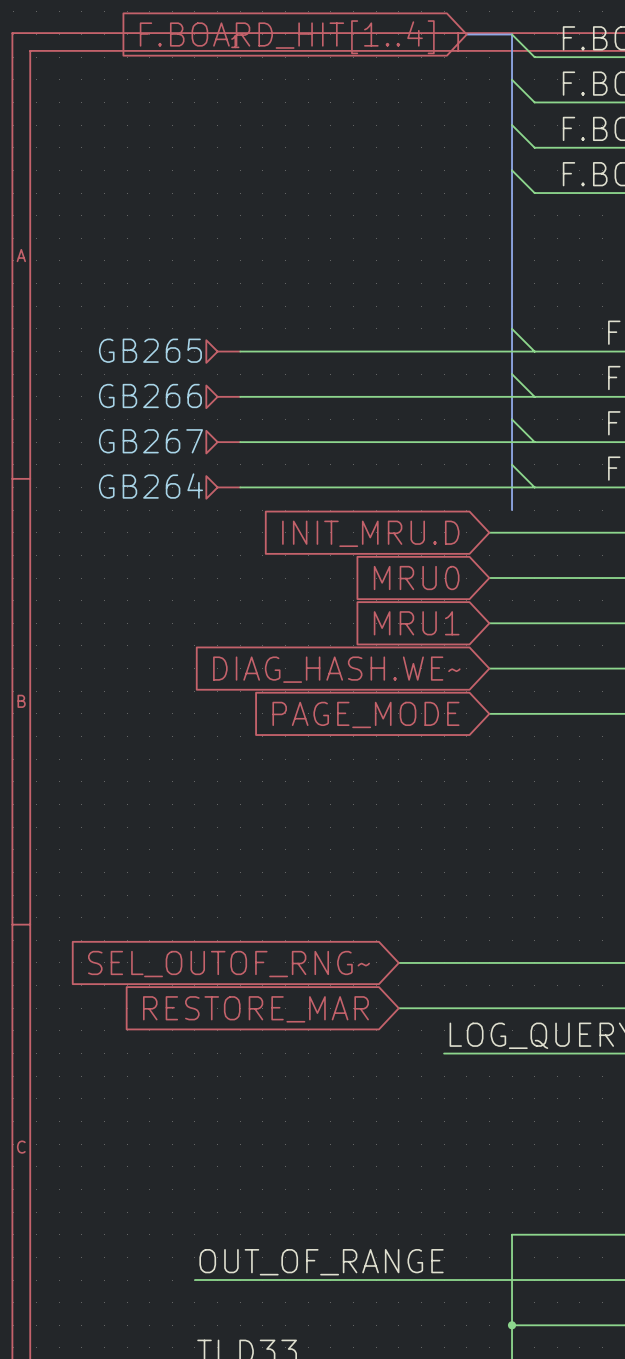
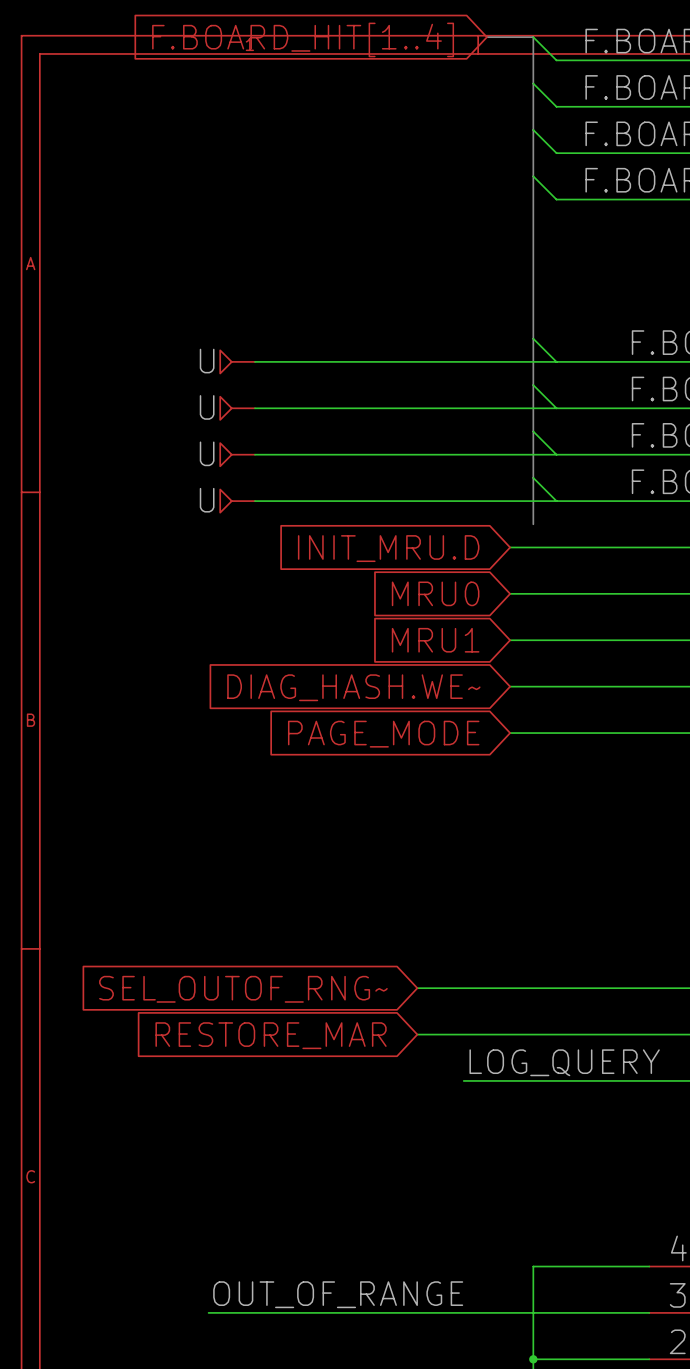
GB265 name: GB265 (150, 350) -> U (207, 361)
GB266 name: GB266 (150, 395) -> U (207, 407)
GB267 name: GB267 (150, 441) -> U (207, 453)
GB264 name: GB264 (150, 486) -> U (207, 500)

